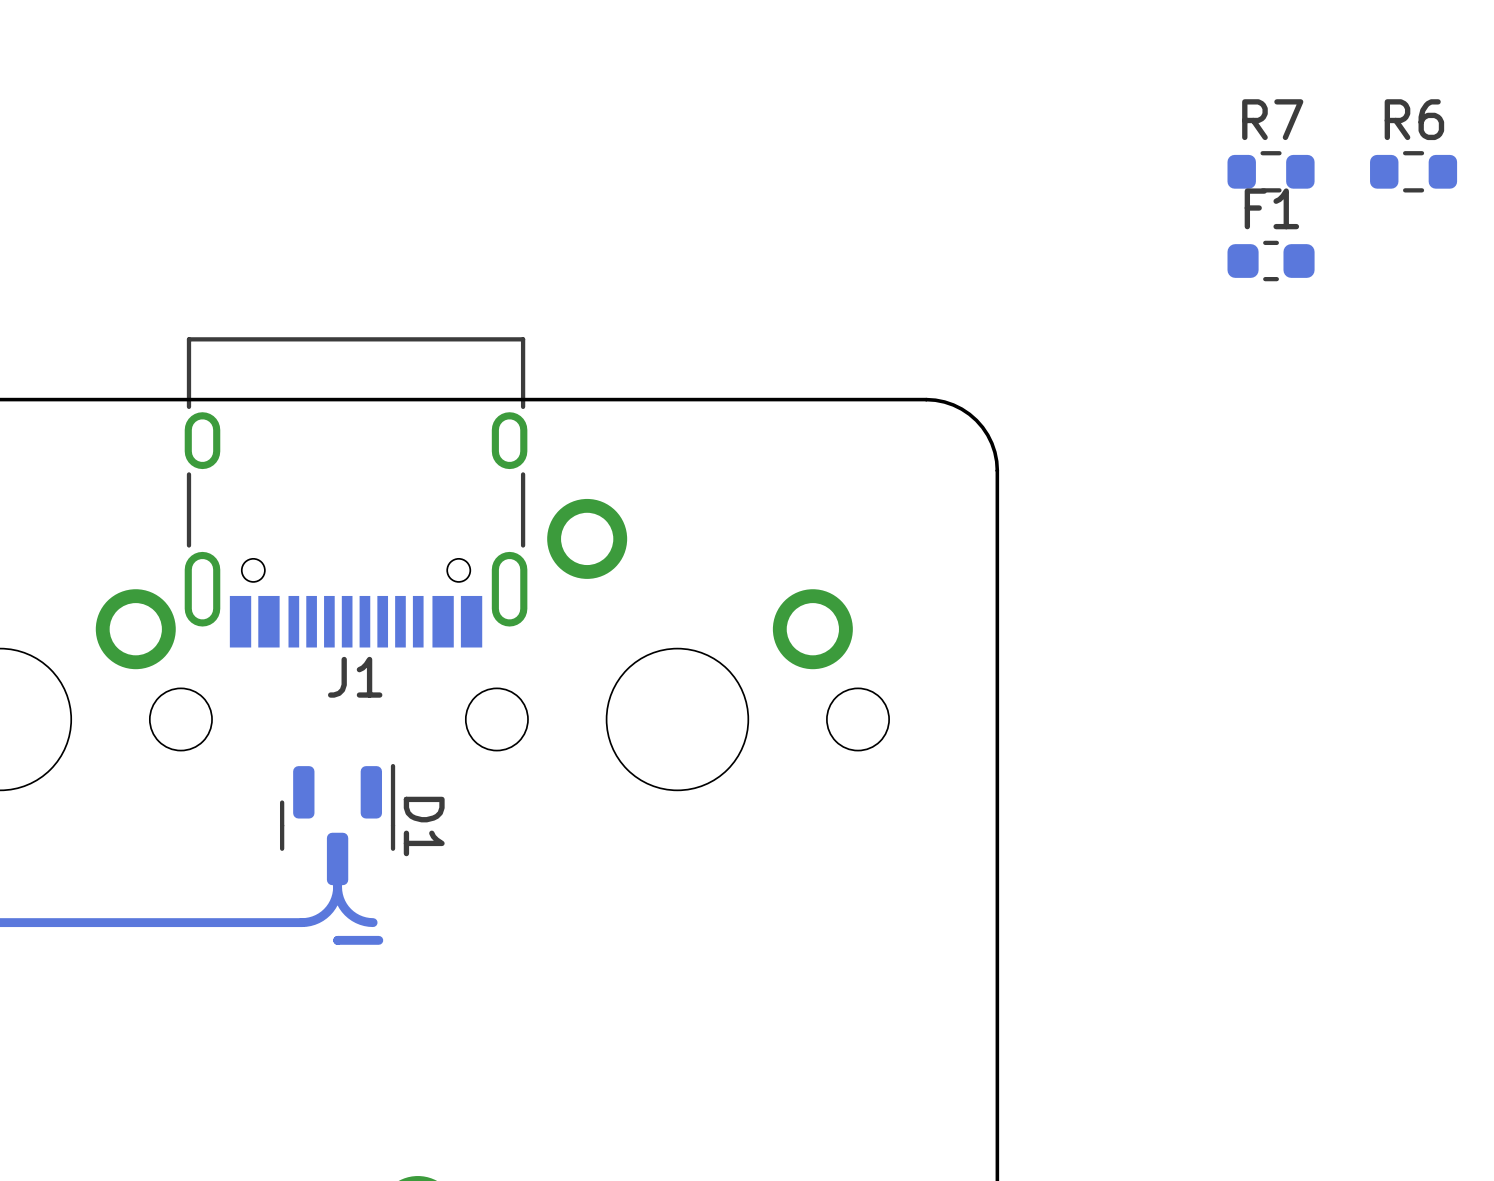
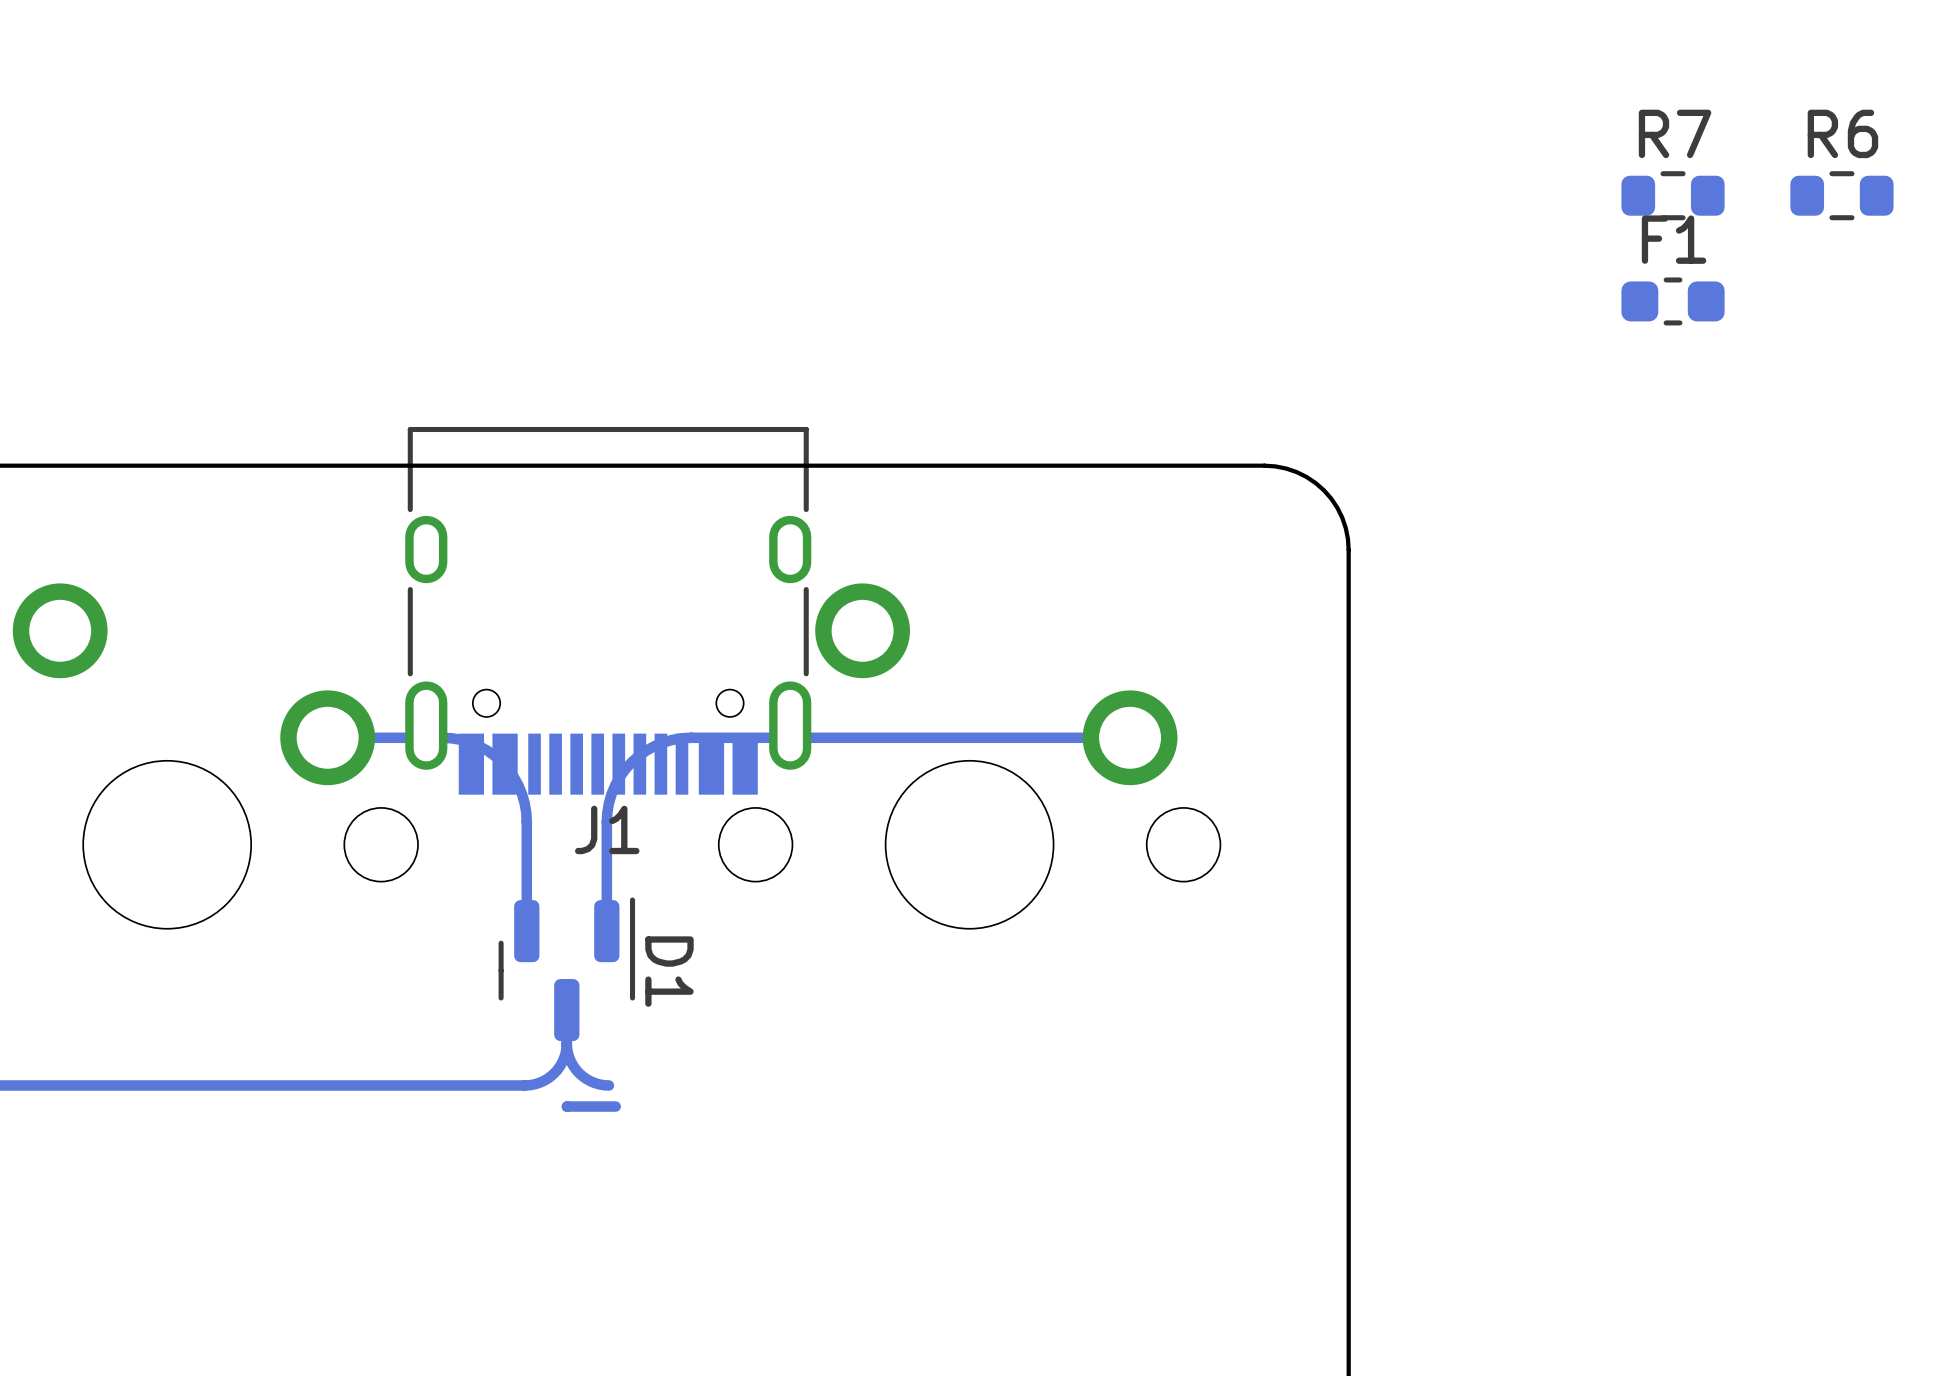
J1 position: (356, 492) -> (608, 610)
track: none -> (327, 737) (451, 738) (479, 746) (502, 762) (518, 785) (526, 812) (526, 931)
track: none -> (1130, 737) (691, 737) (663, 742) (646, 750) (631, 762) (619, 777) (611, 794) (606, 822) (606, 931)

